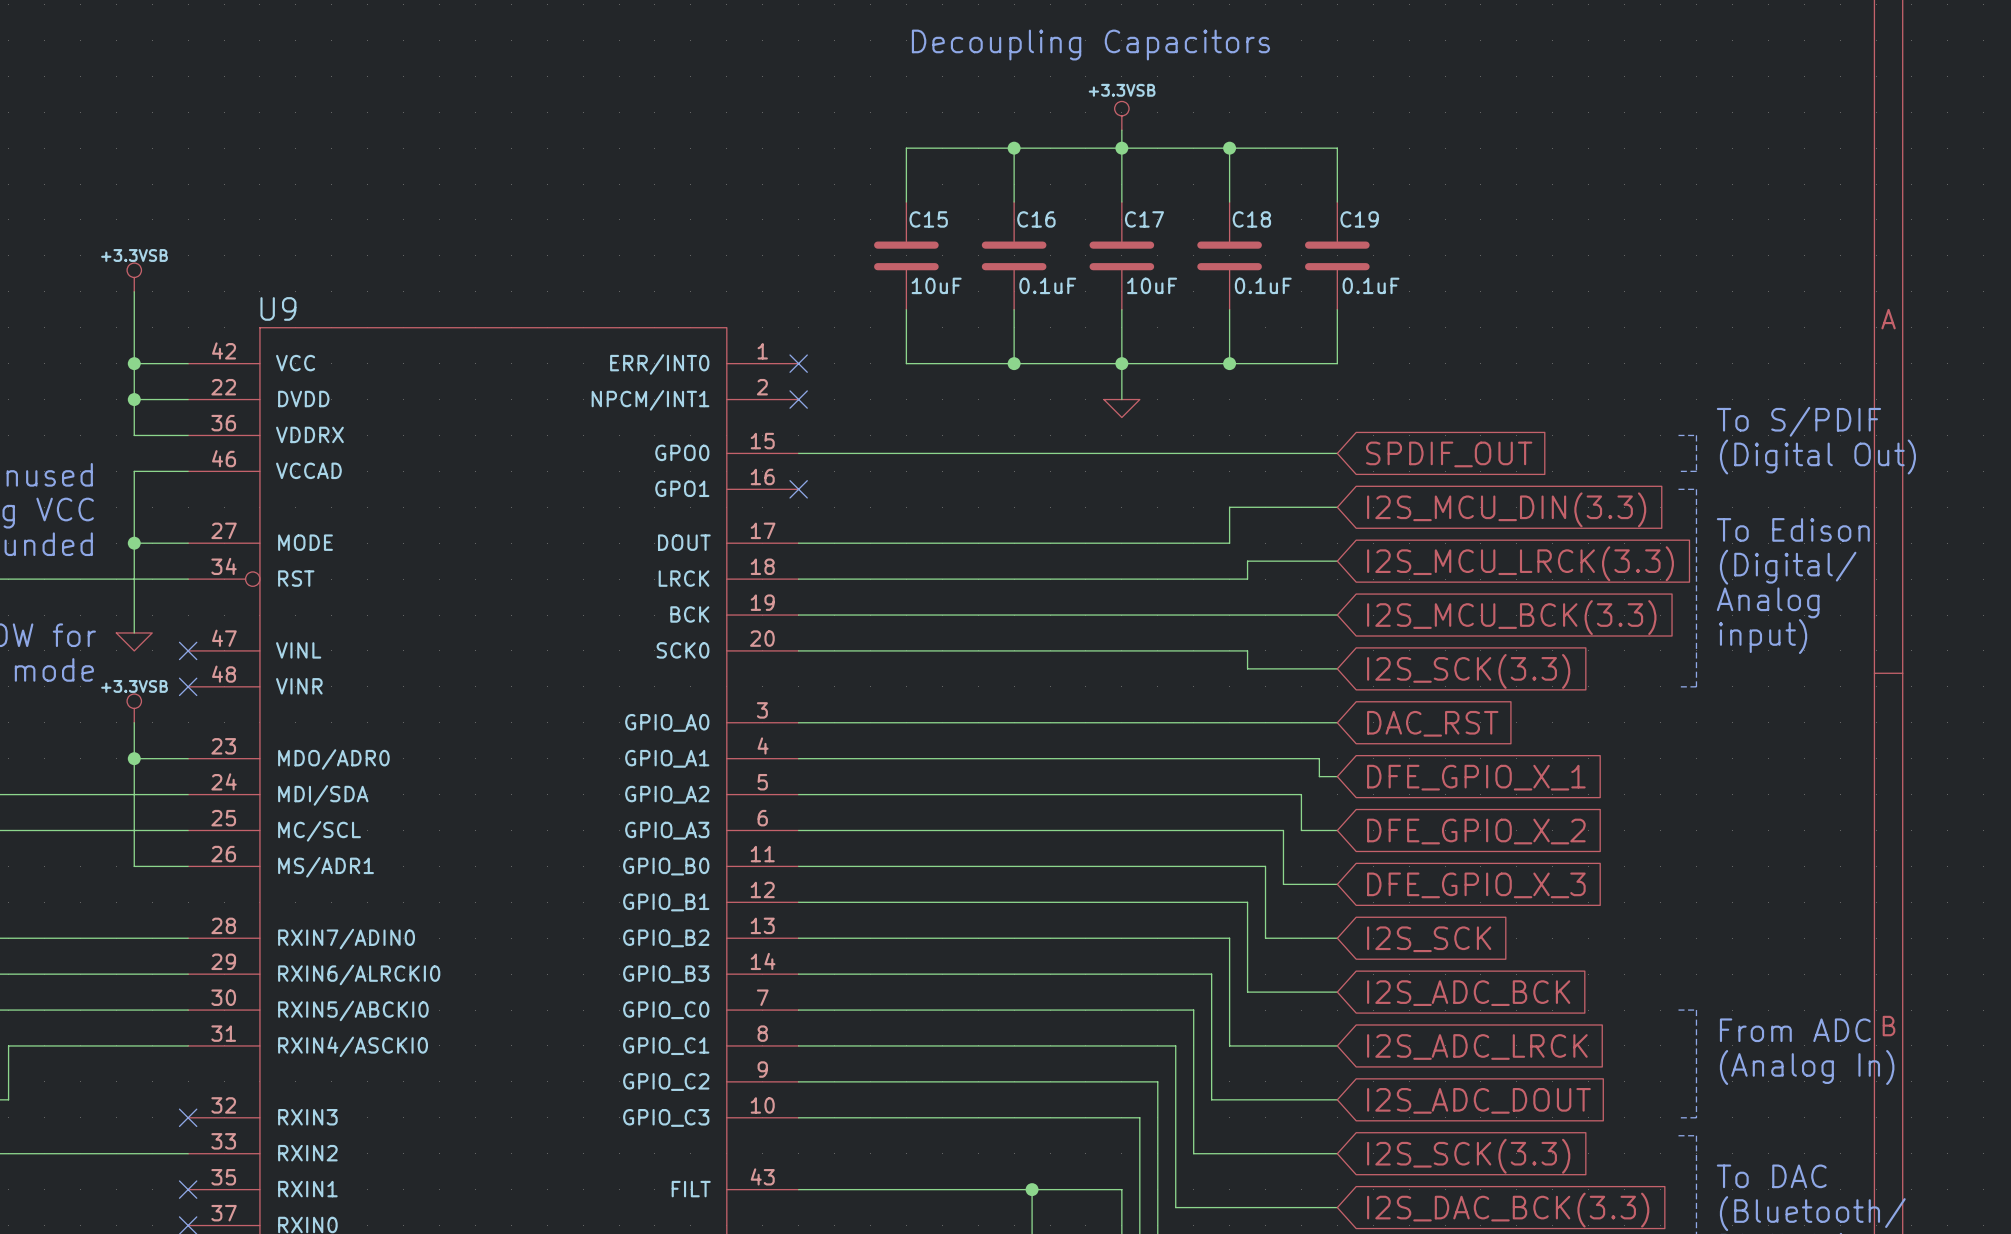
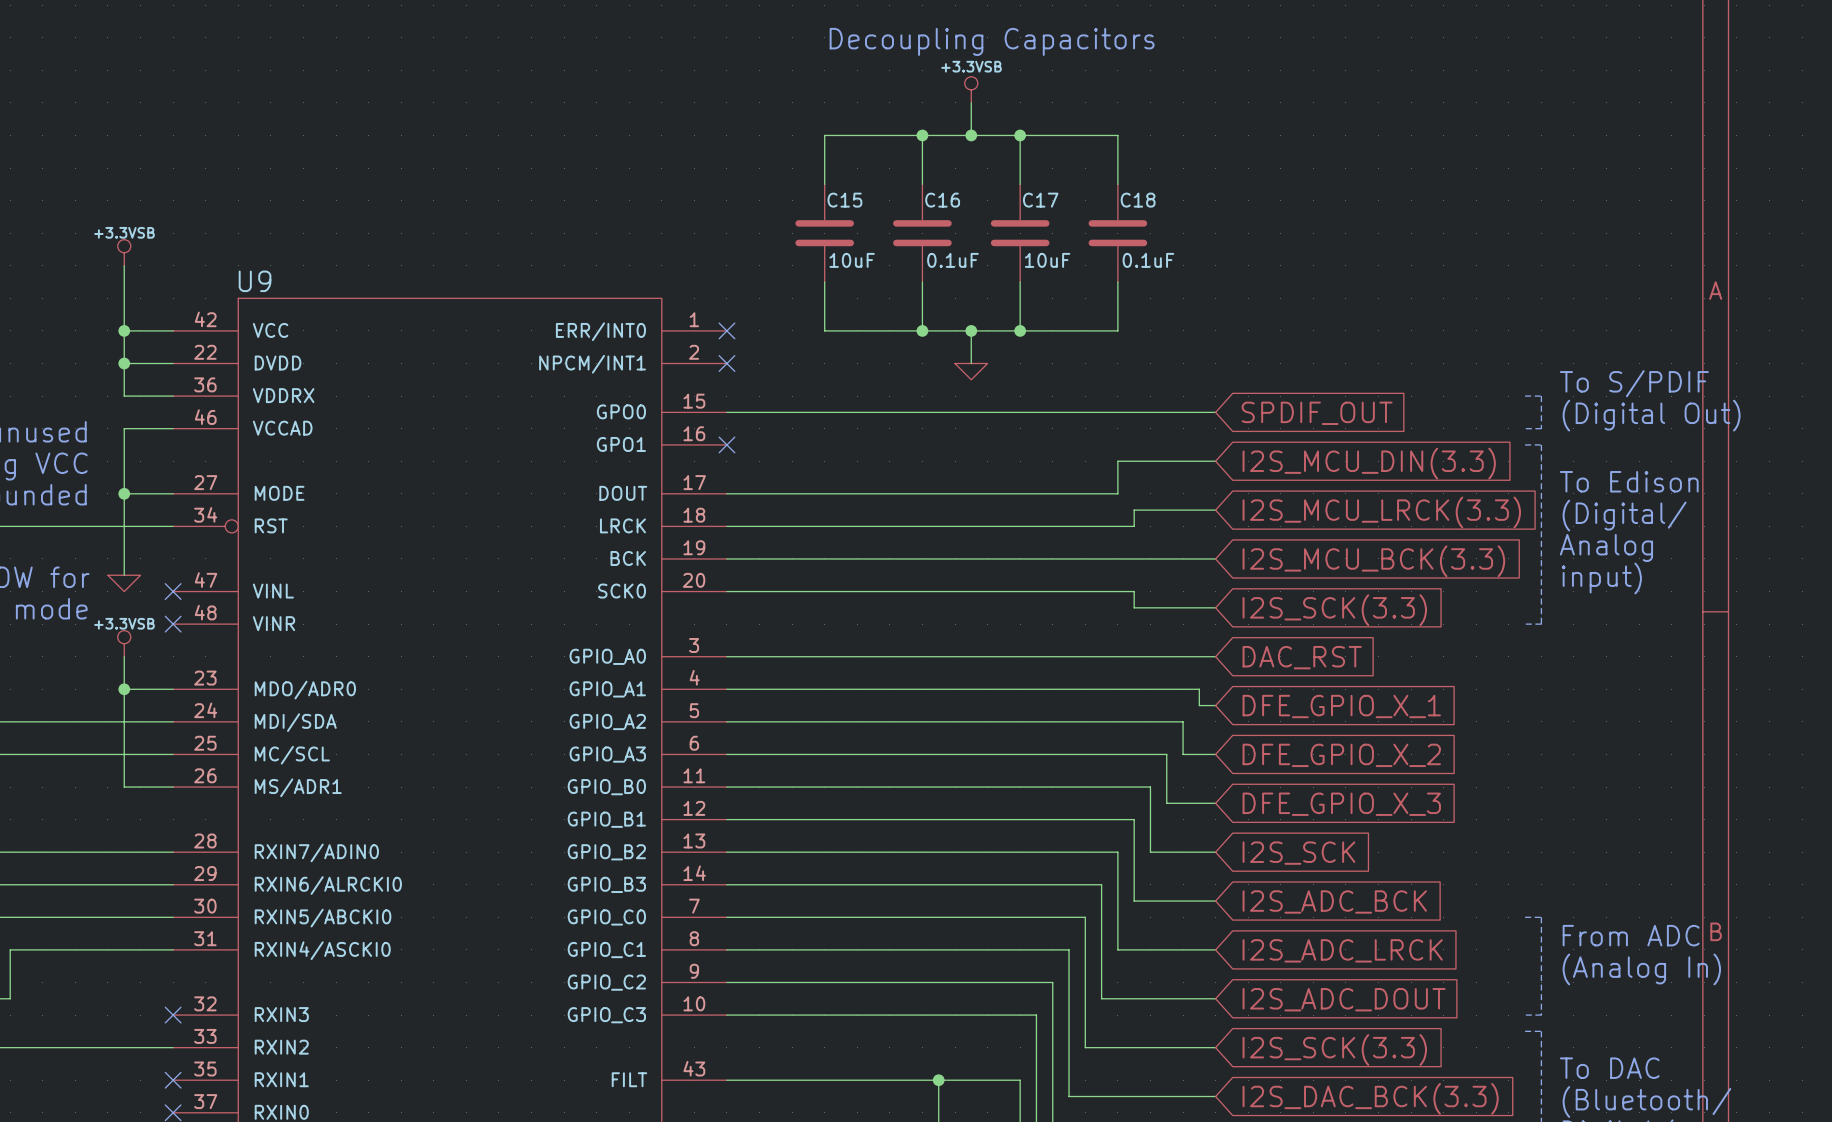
wire: none -> (971, 102) (971, 135)
power symbol position: +3.3VSB (1121, 115) -> +3.3VSB (971, 89)
wire: (1121, 130) (1121, 148) -> none
junction: none -> (971, 135)
wire: (1229, 148) (1337, 148) (1337, 202) -> none
junction: (1229, 148) -> none
C19: 0.1uF (1337, 255) -> none
wire: (1337, 309) (1337, 363) (1229, 363) -> none
junction: none -> (971, 330)
wire: (1121, 363) (1121, 399) -> (971, 330) (971, 363)
junction: (1229, 363) -> none
power symbol position: (1121, 408) -> (971, 371)

